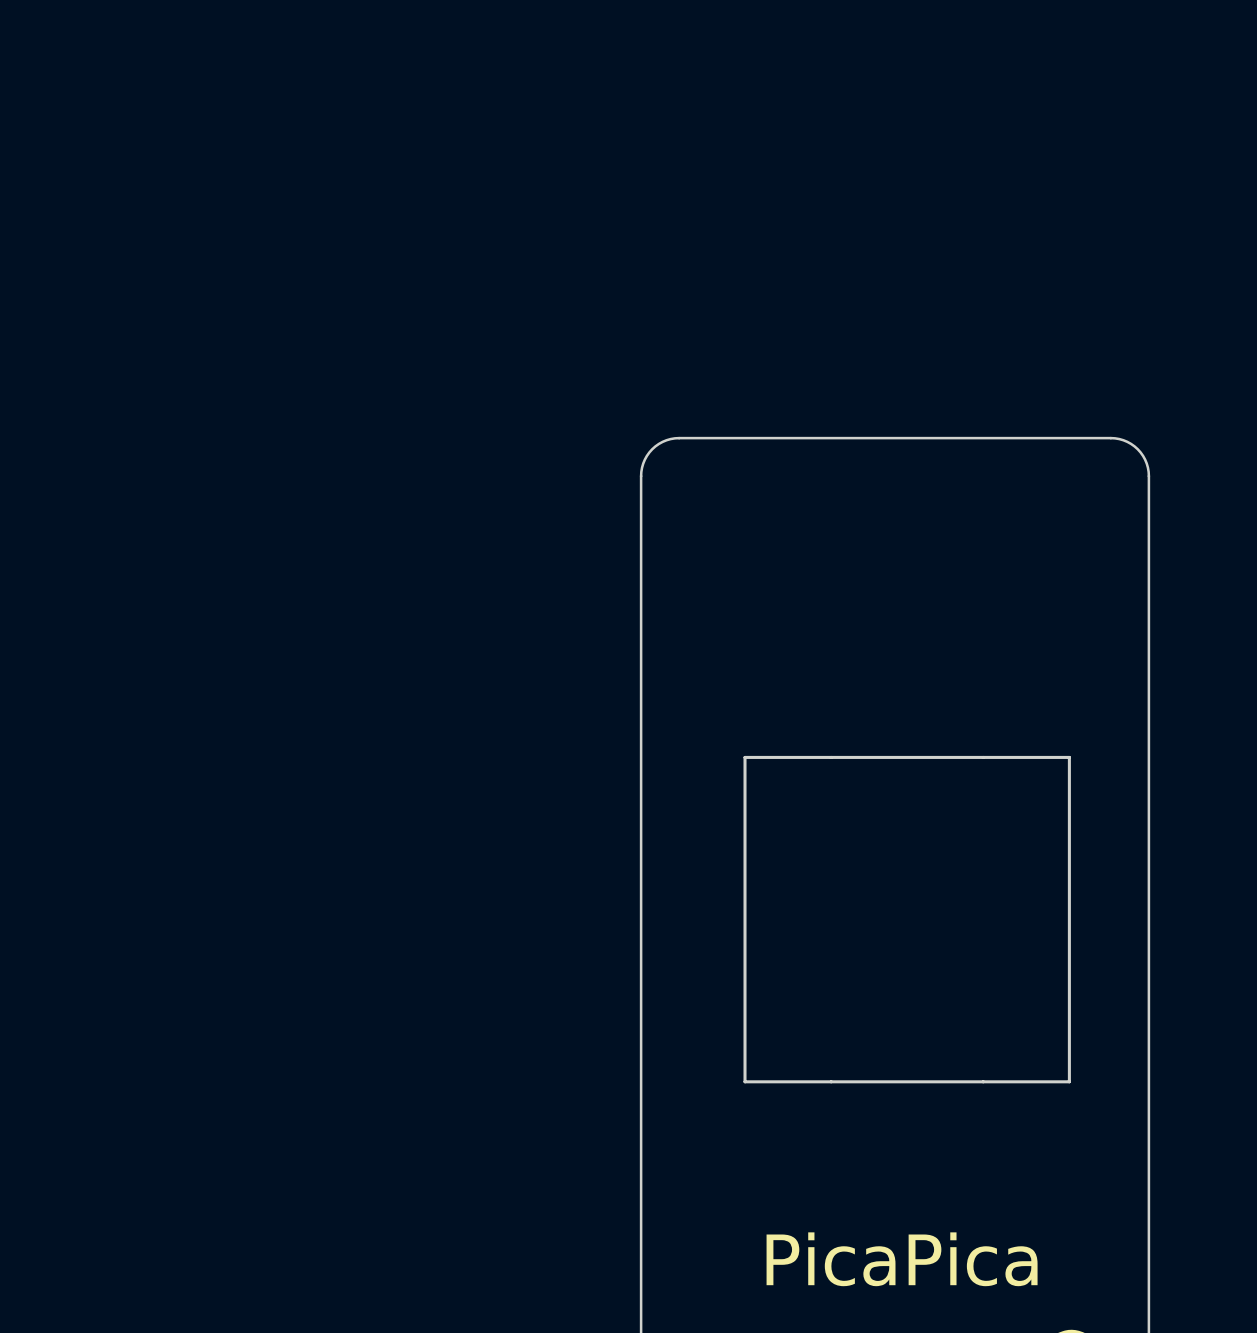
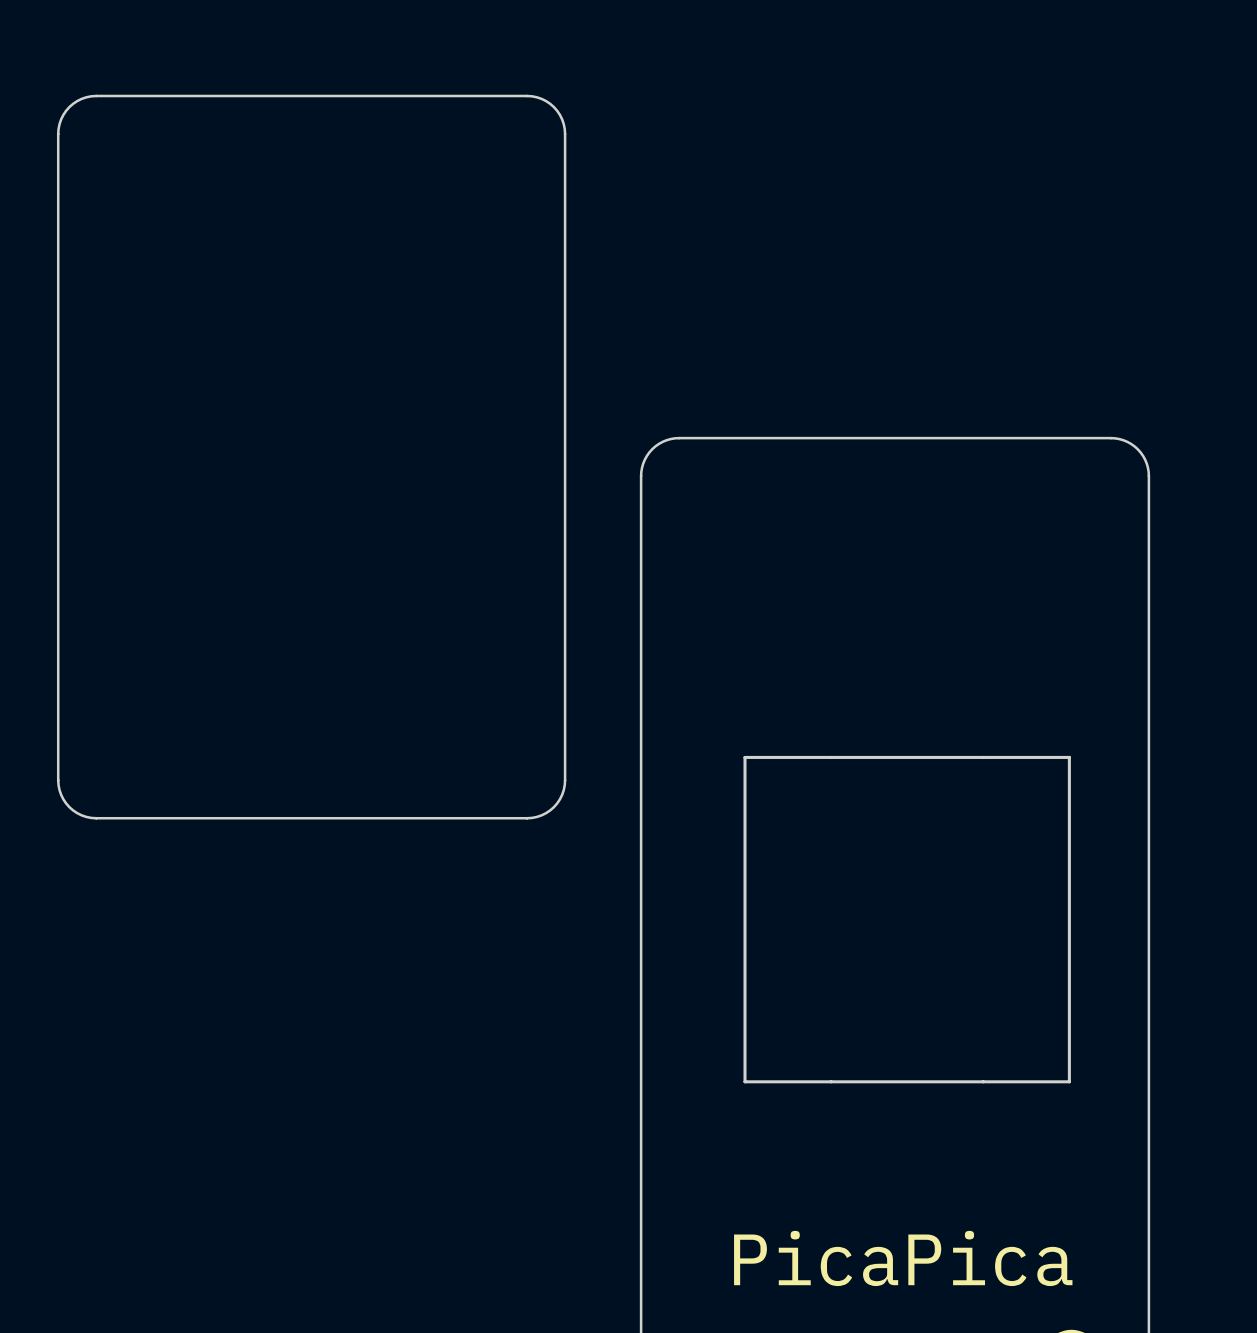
board edge: none -> (96, 95) (527, 95) (546, 101) (559, 115) (565, 134) (565, 780) (559, 799) (546, 813) (527, 818) (96, 818) (77, 813) (63, 799) (58, 780) (58, 134) (61, 119) (69, 107) (81, 98) (96, 95)

